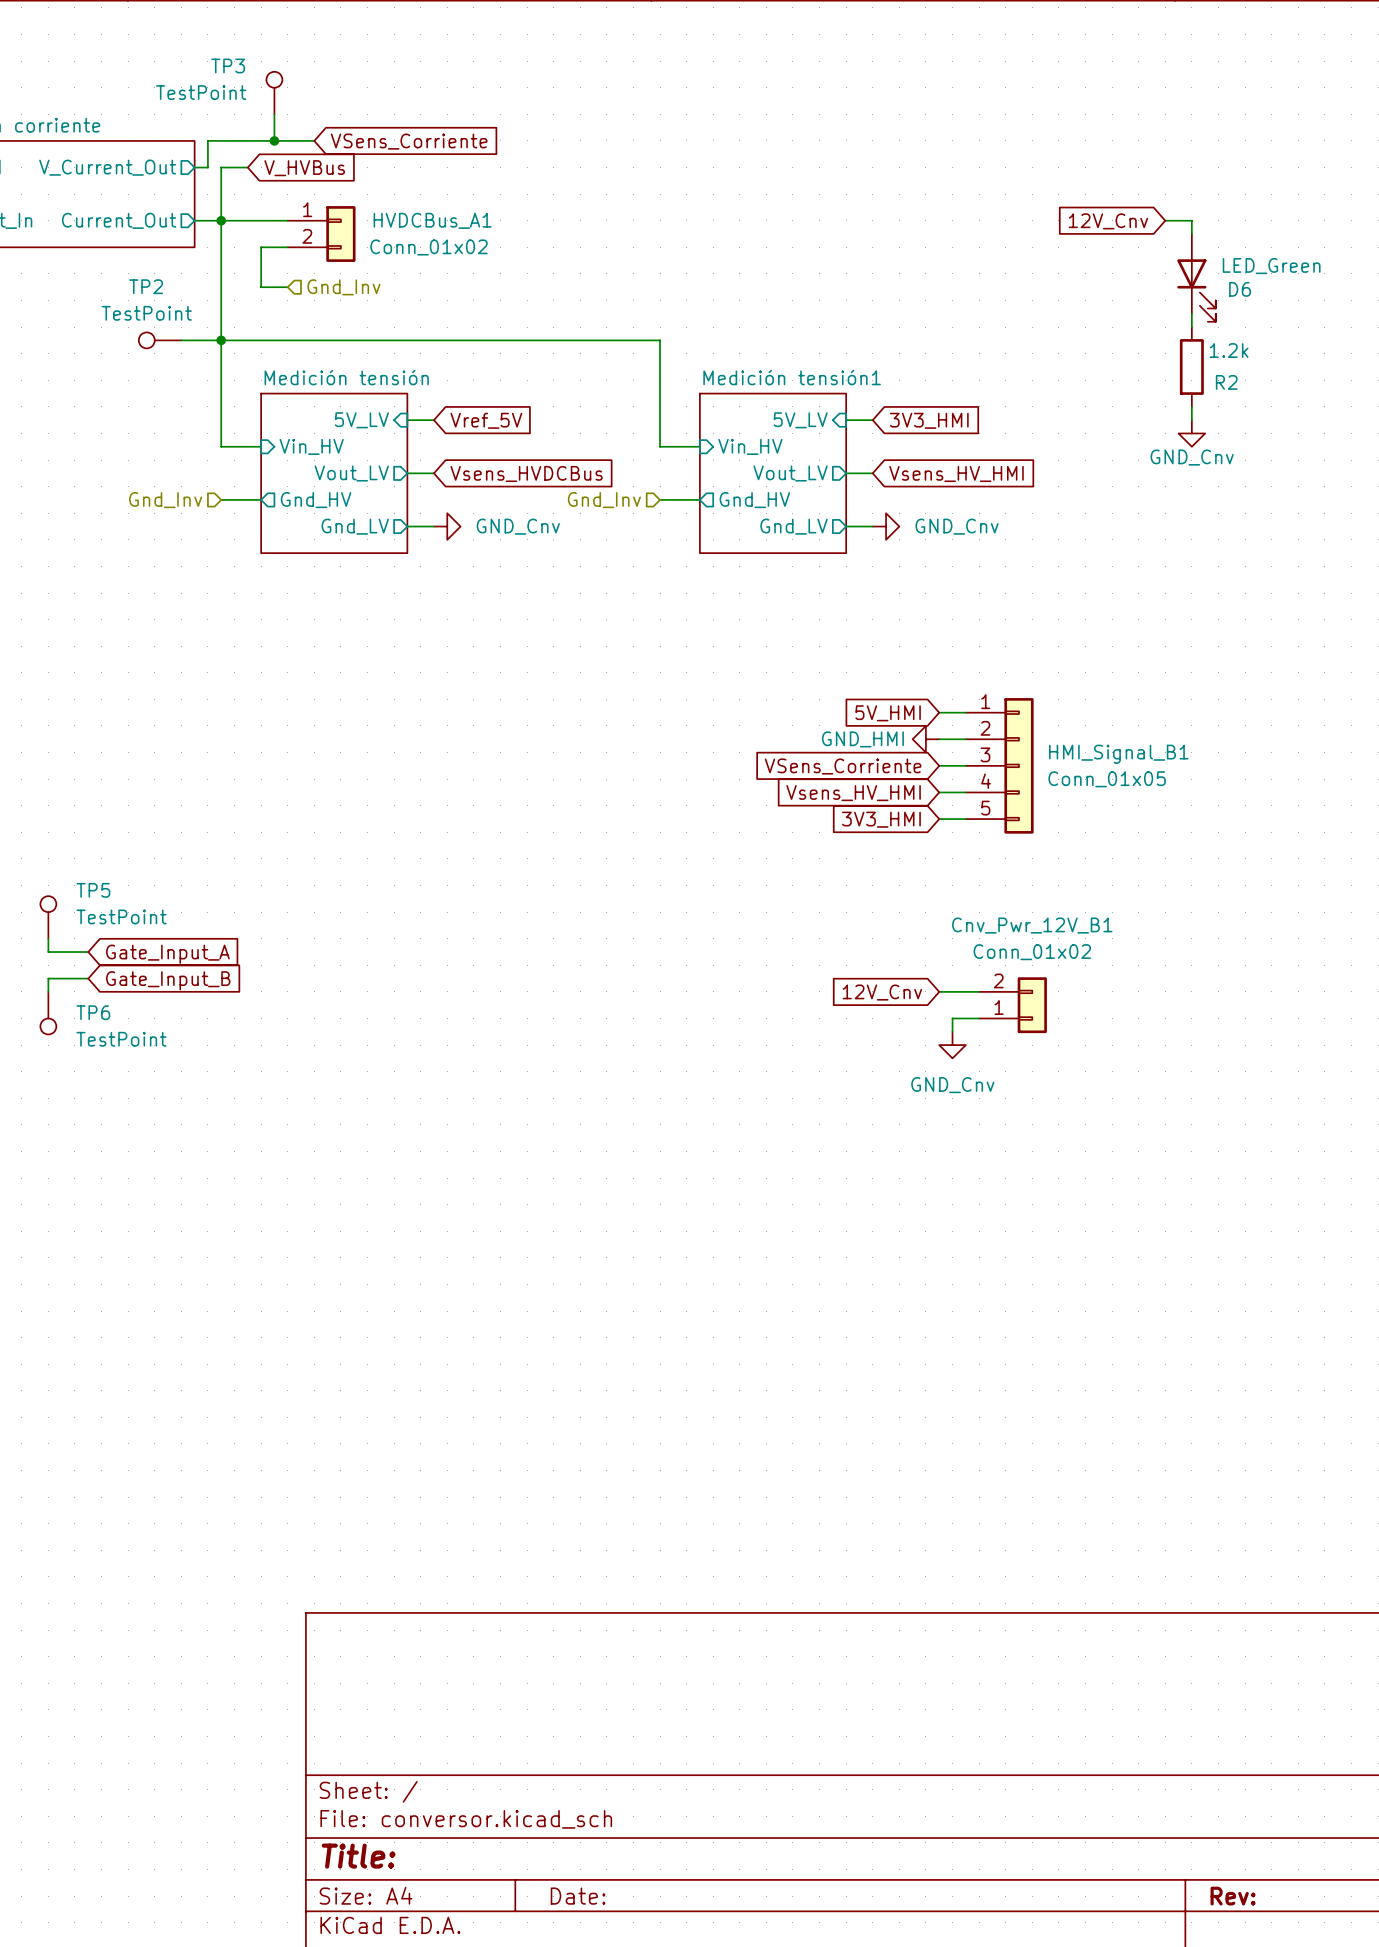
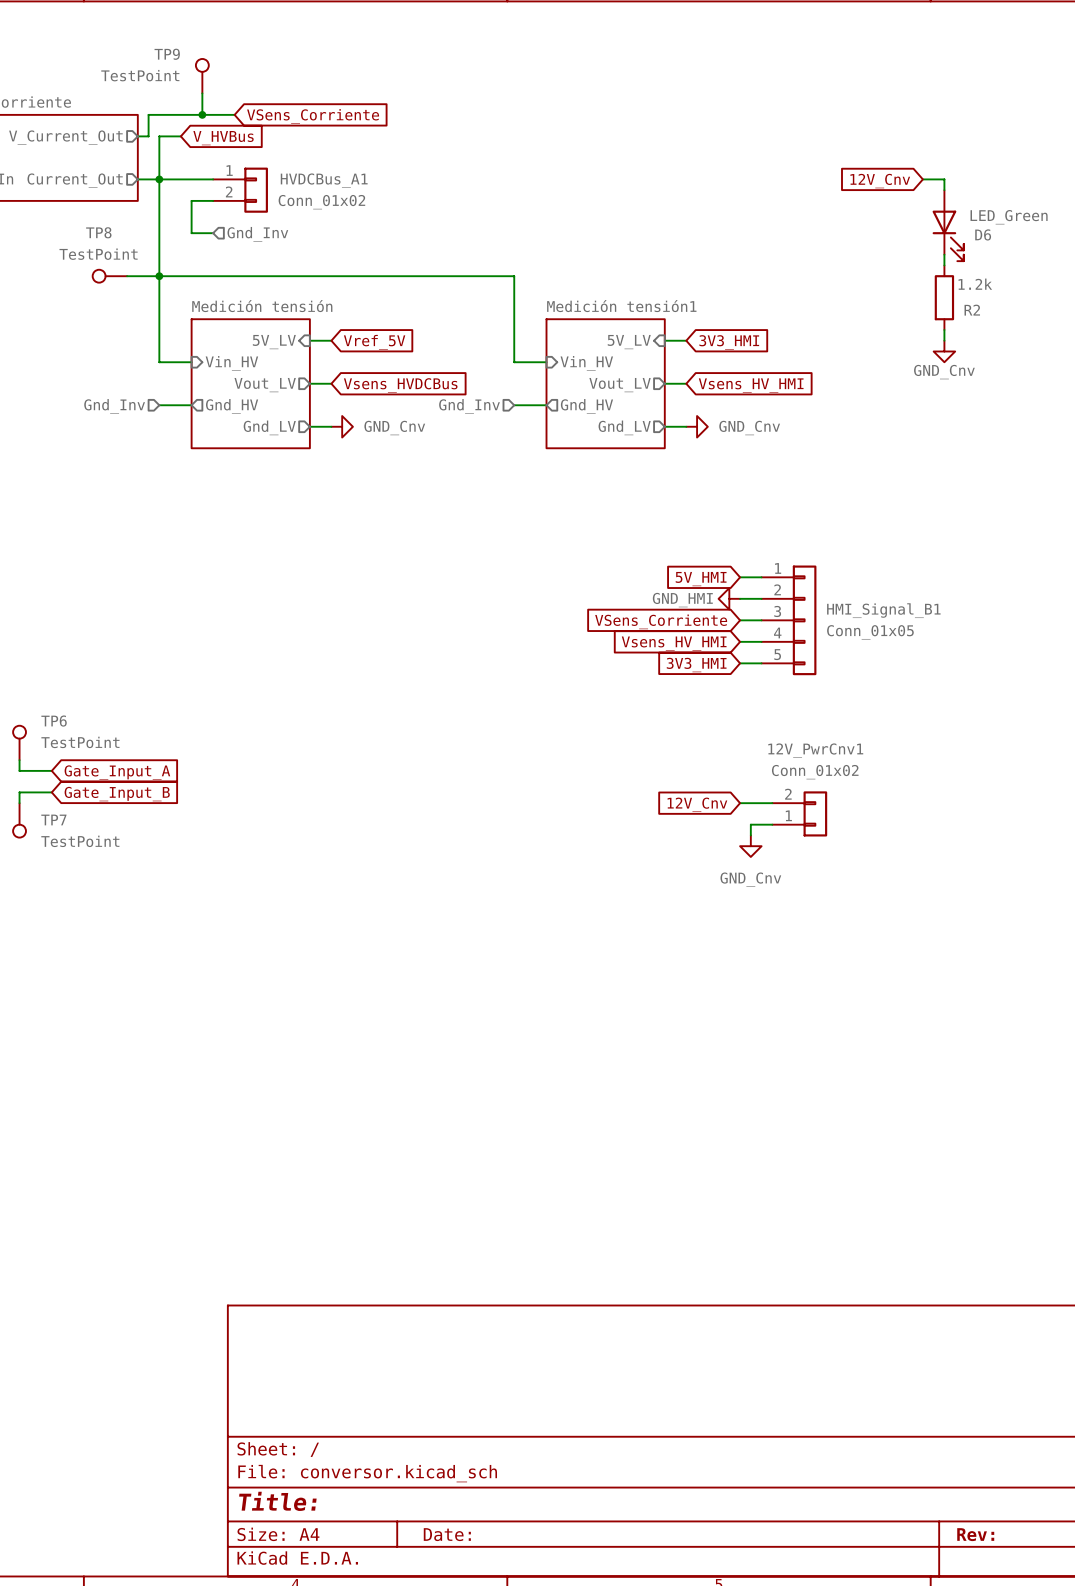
TP3 name: TP3 (228, 65) -> TP9 (167, 54)
TP2 name: TP2 (146, 286) -> TP8 (98, 232)
TP5 name: TP5 (93, 890) -> TP6 (54, 721)
Cnv_Pwr_12V_B1 name: Cnv_Pwr_12V_B1 (1032, 925) -> 12V_PwrCnv1 (815, 750)
TP6 name: TP6 (93, 1012) -> TP7 (53, 819)

